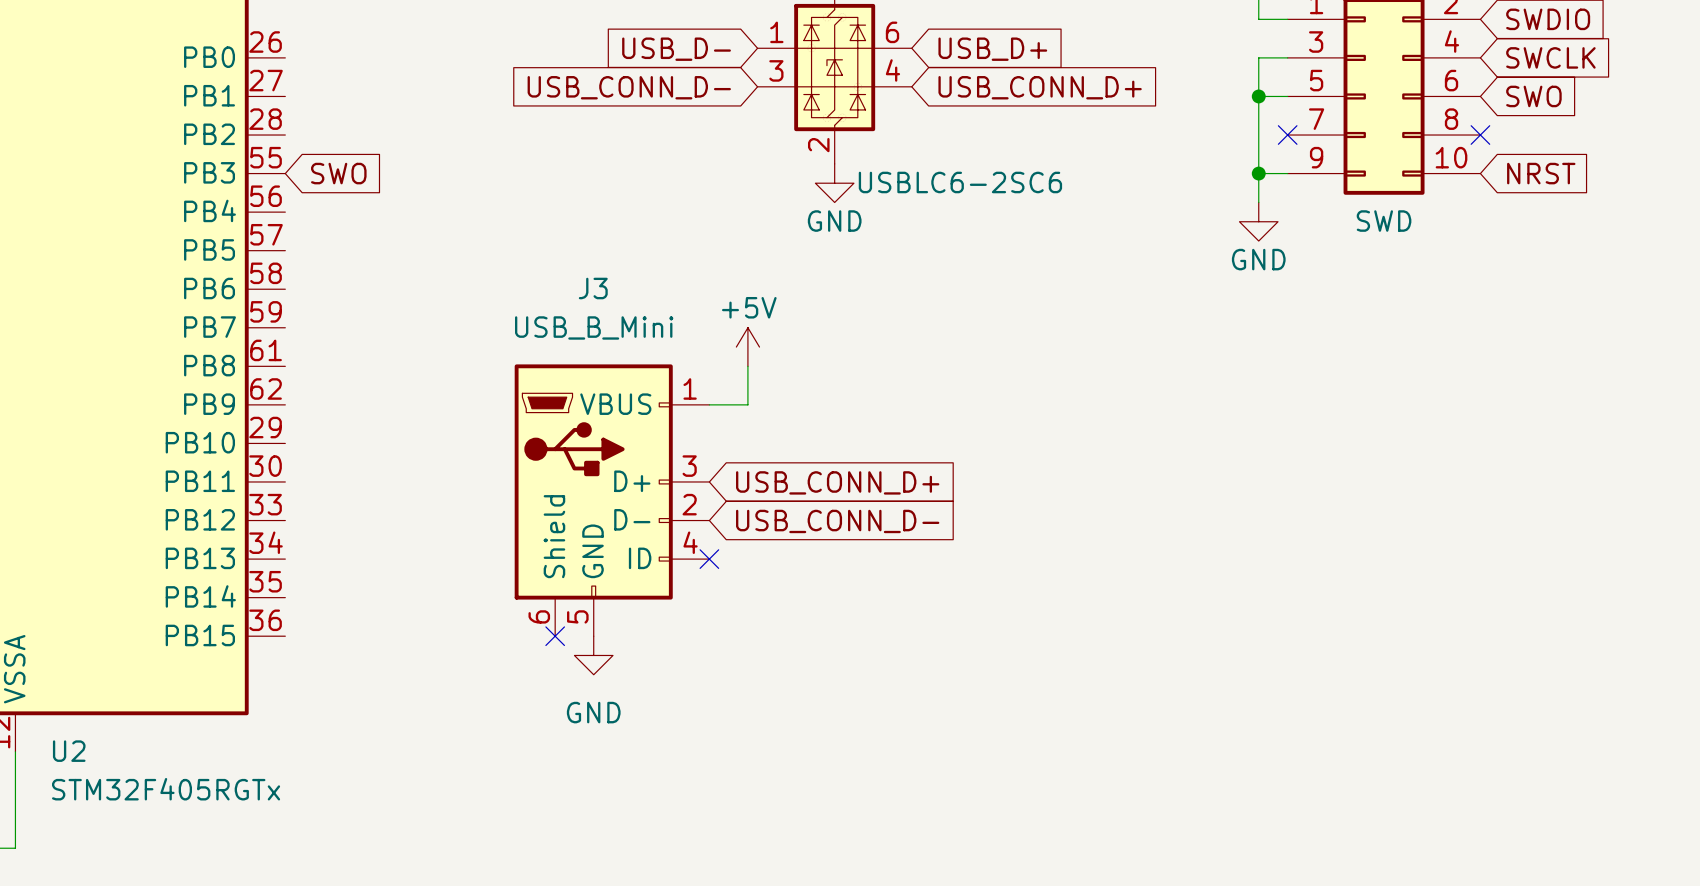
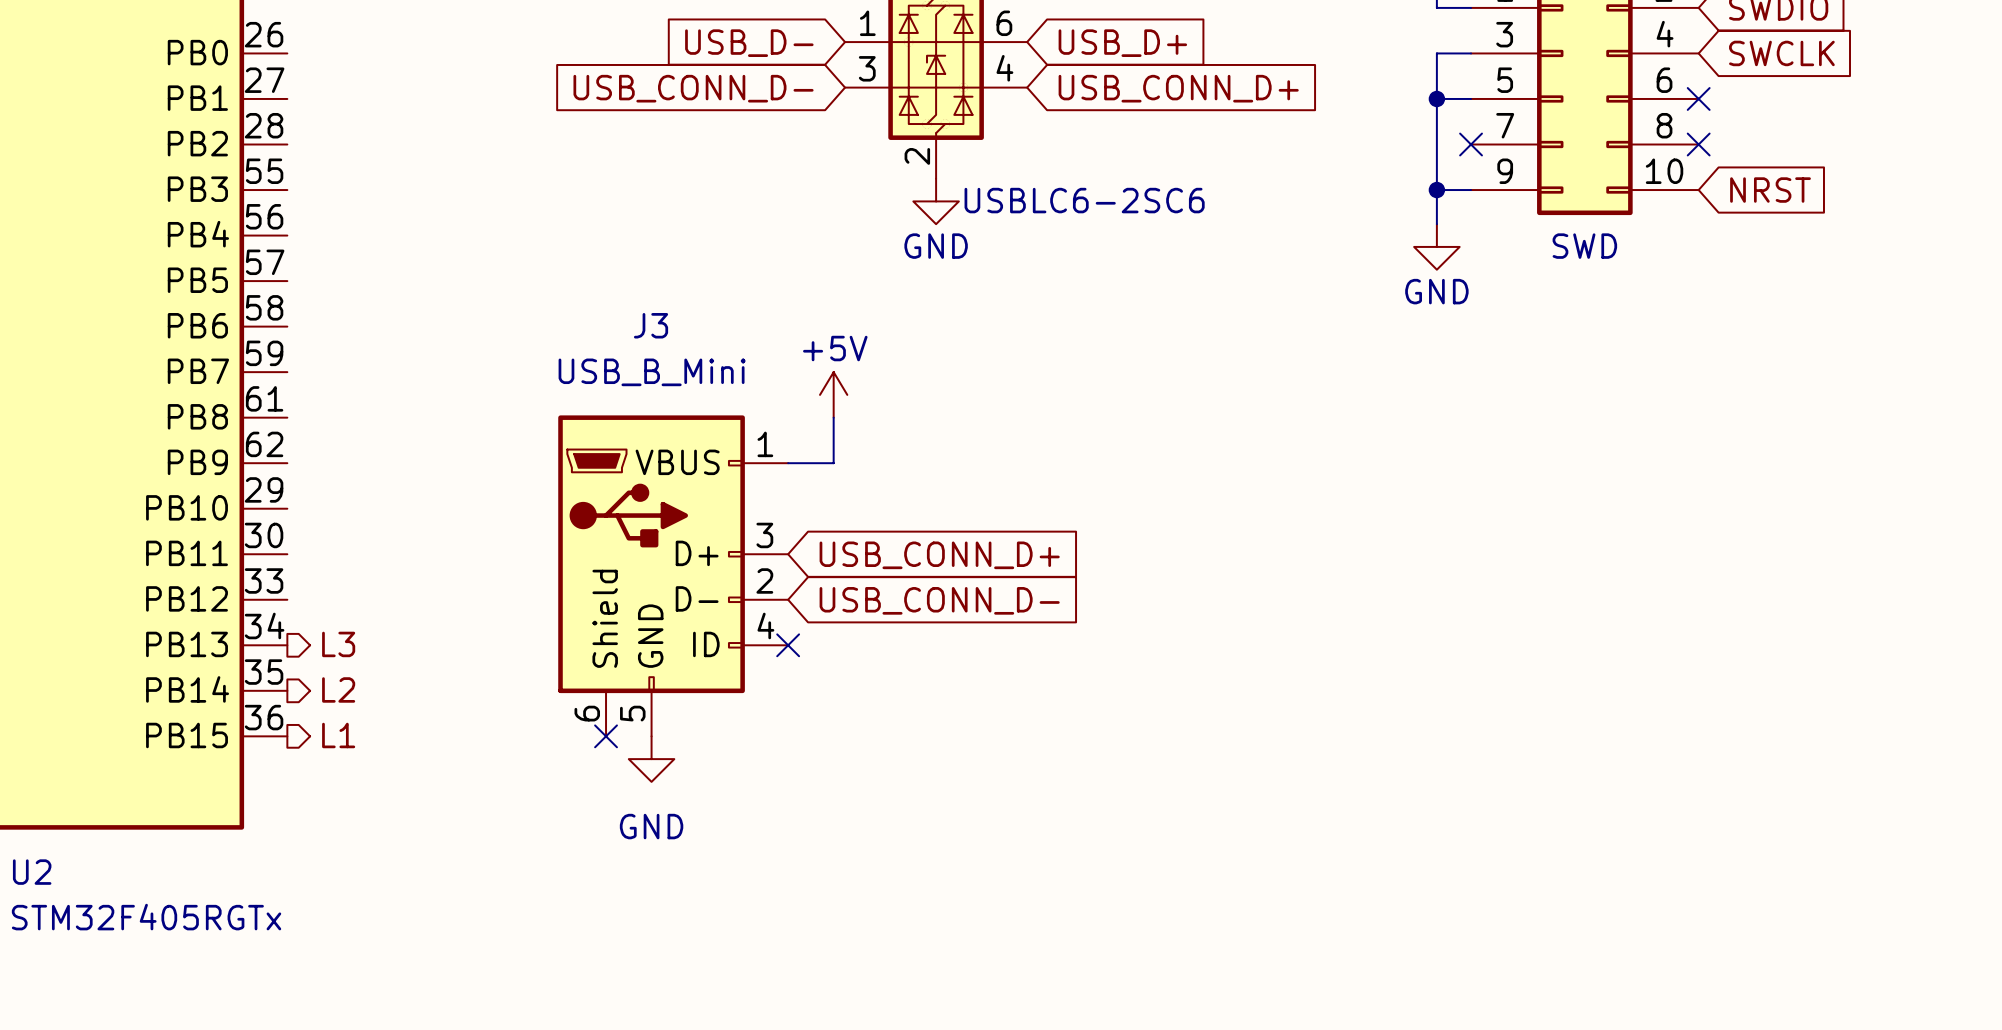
no-connect mark: none -> (1698, 98)
global label: SWO (1533, 96) -> none
global label: SWO (338, 173) -> none
hierarchical label: none -> L3 (338, 644)
hierarchical label: none -> L2 (338, 689)
hierarchical label: none -> L1 (338, 735)

